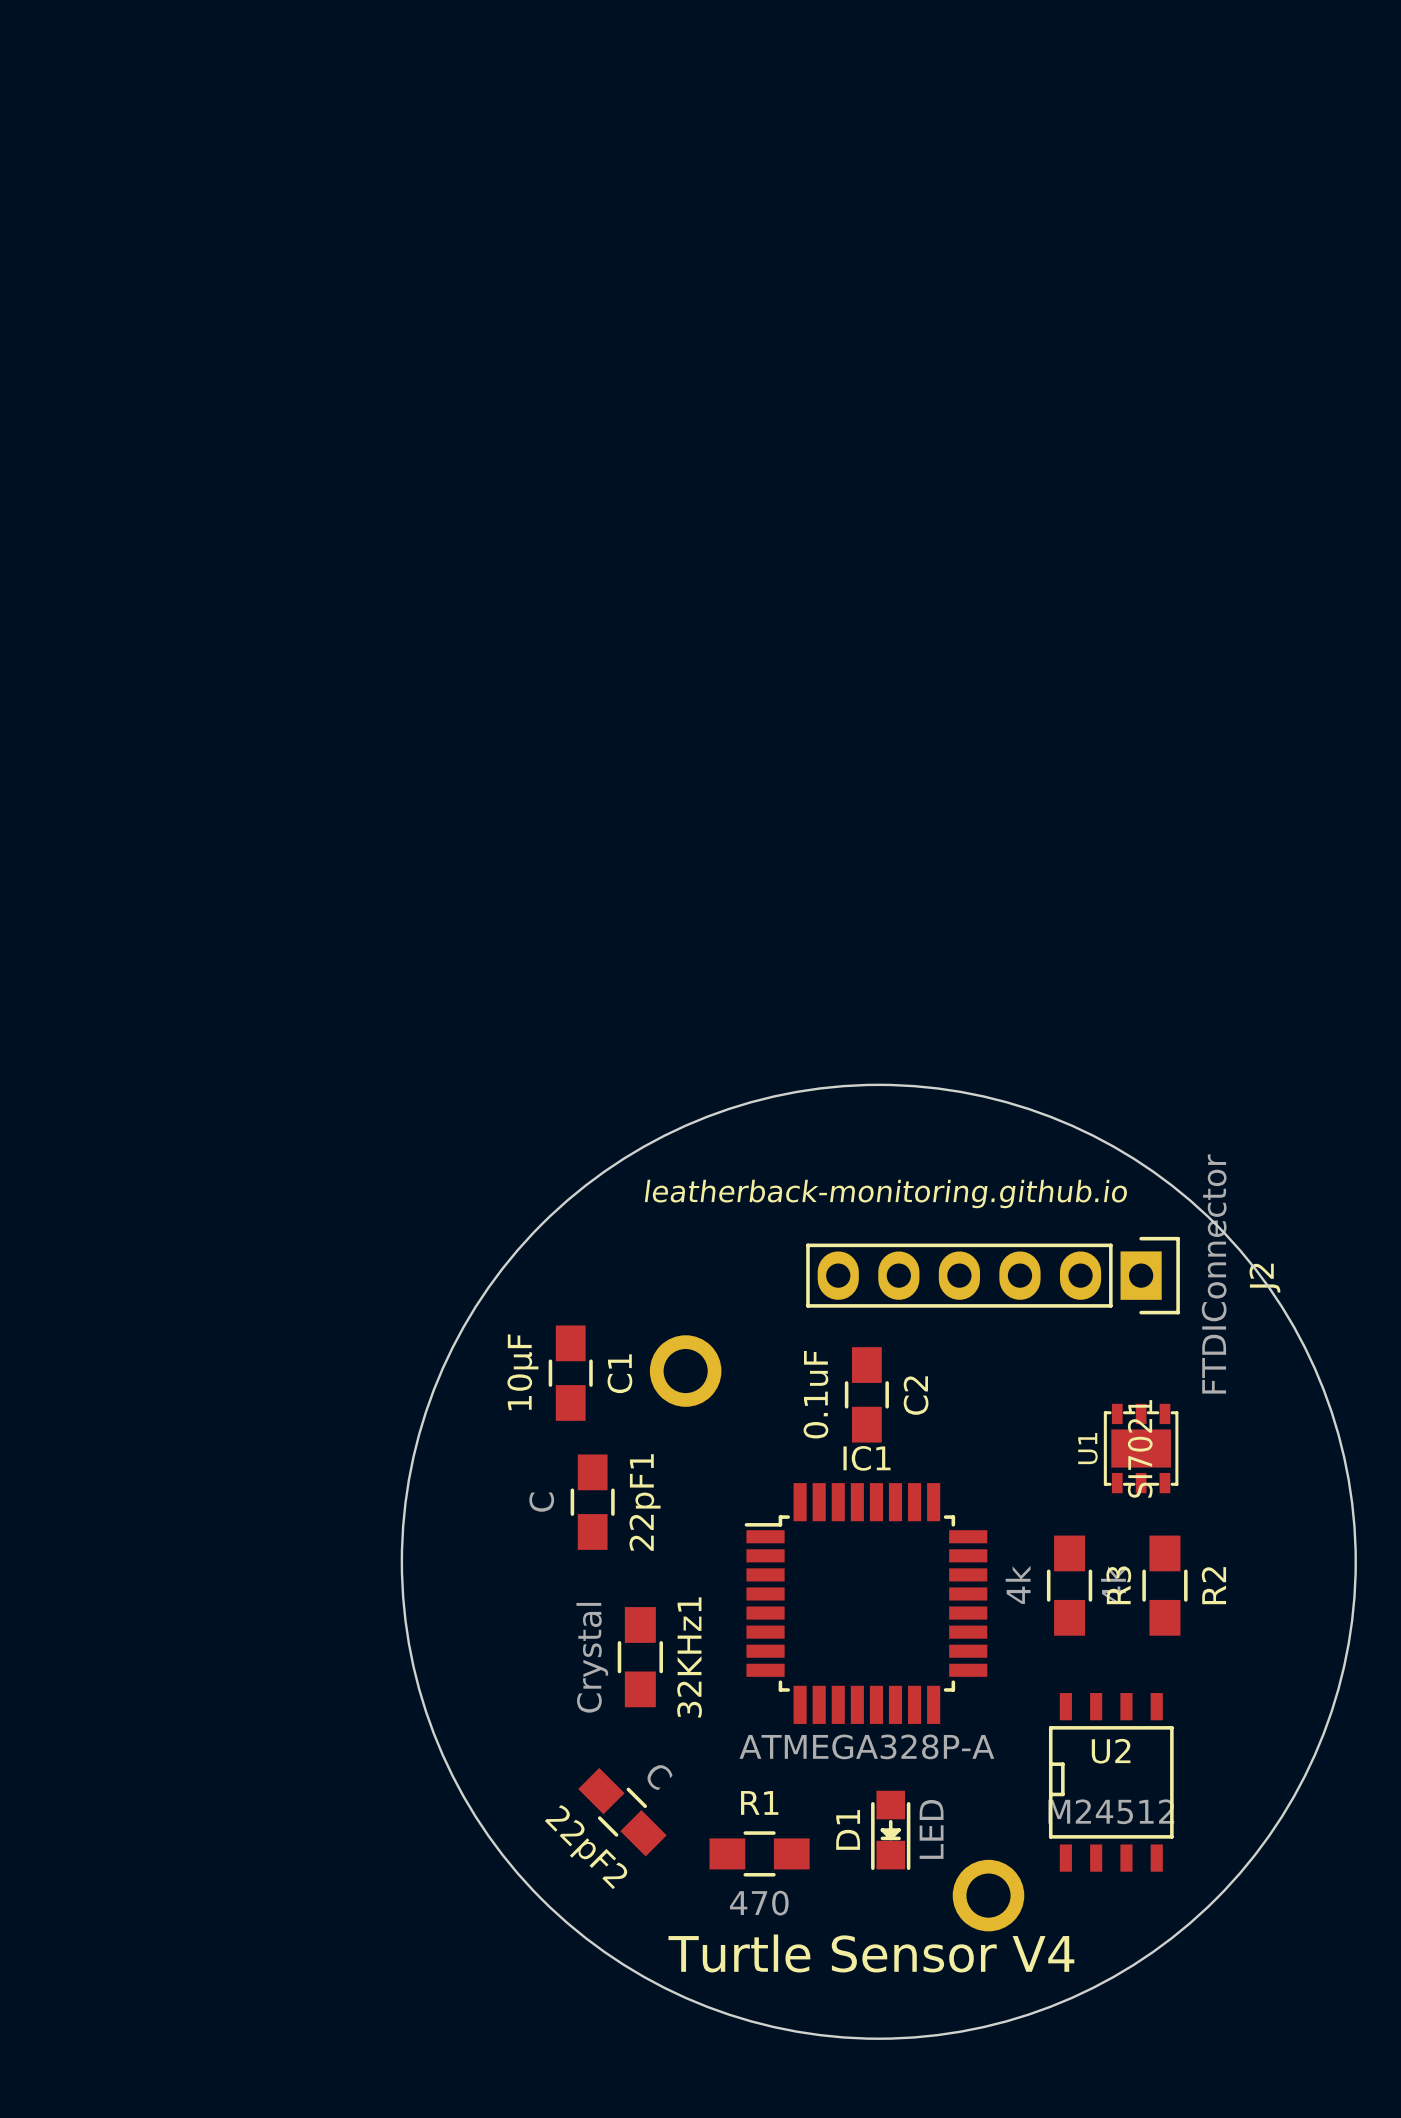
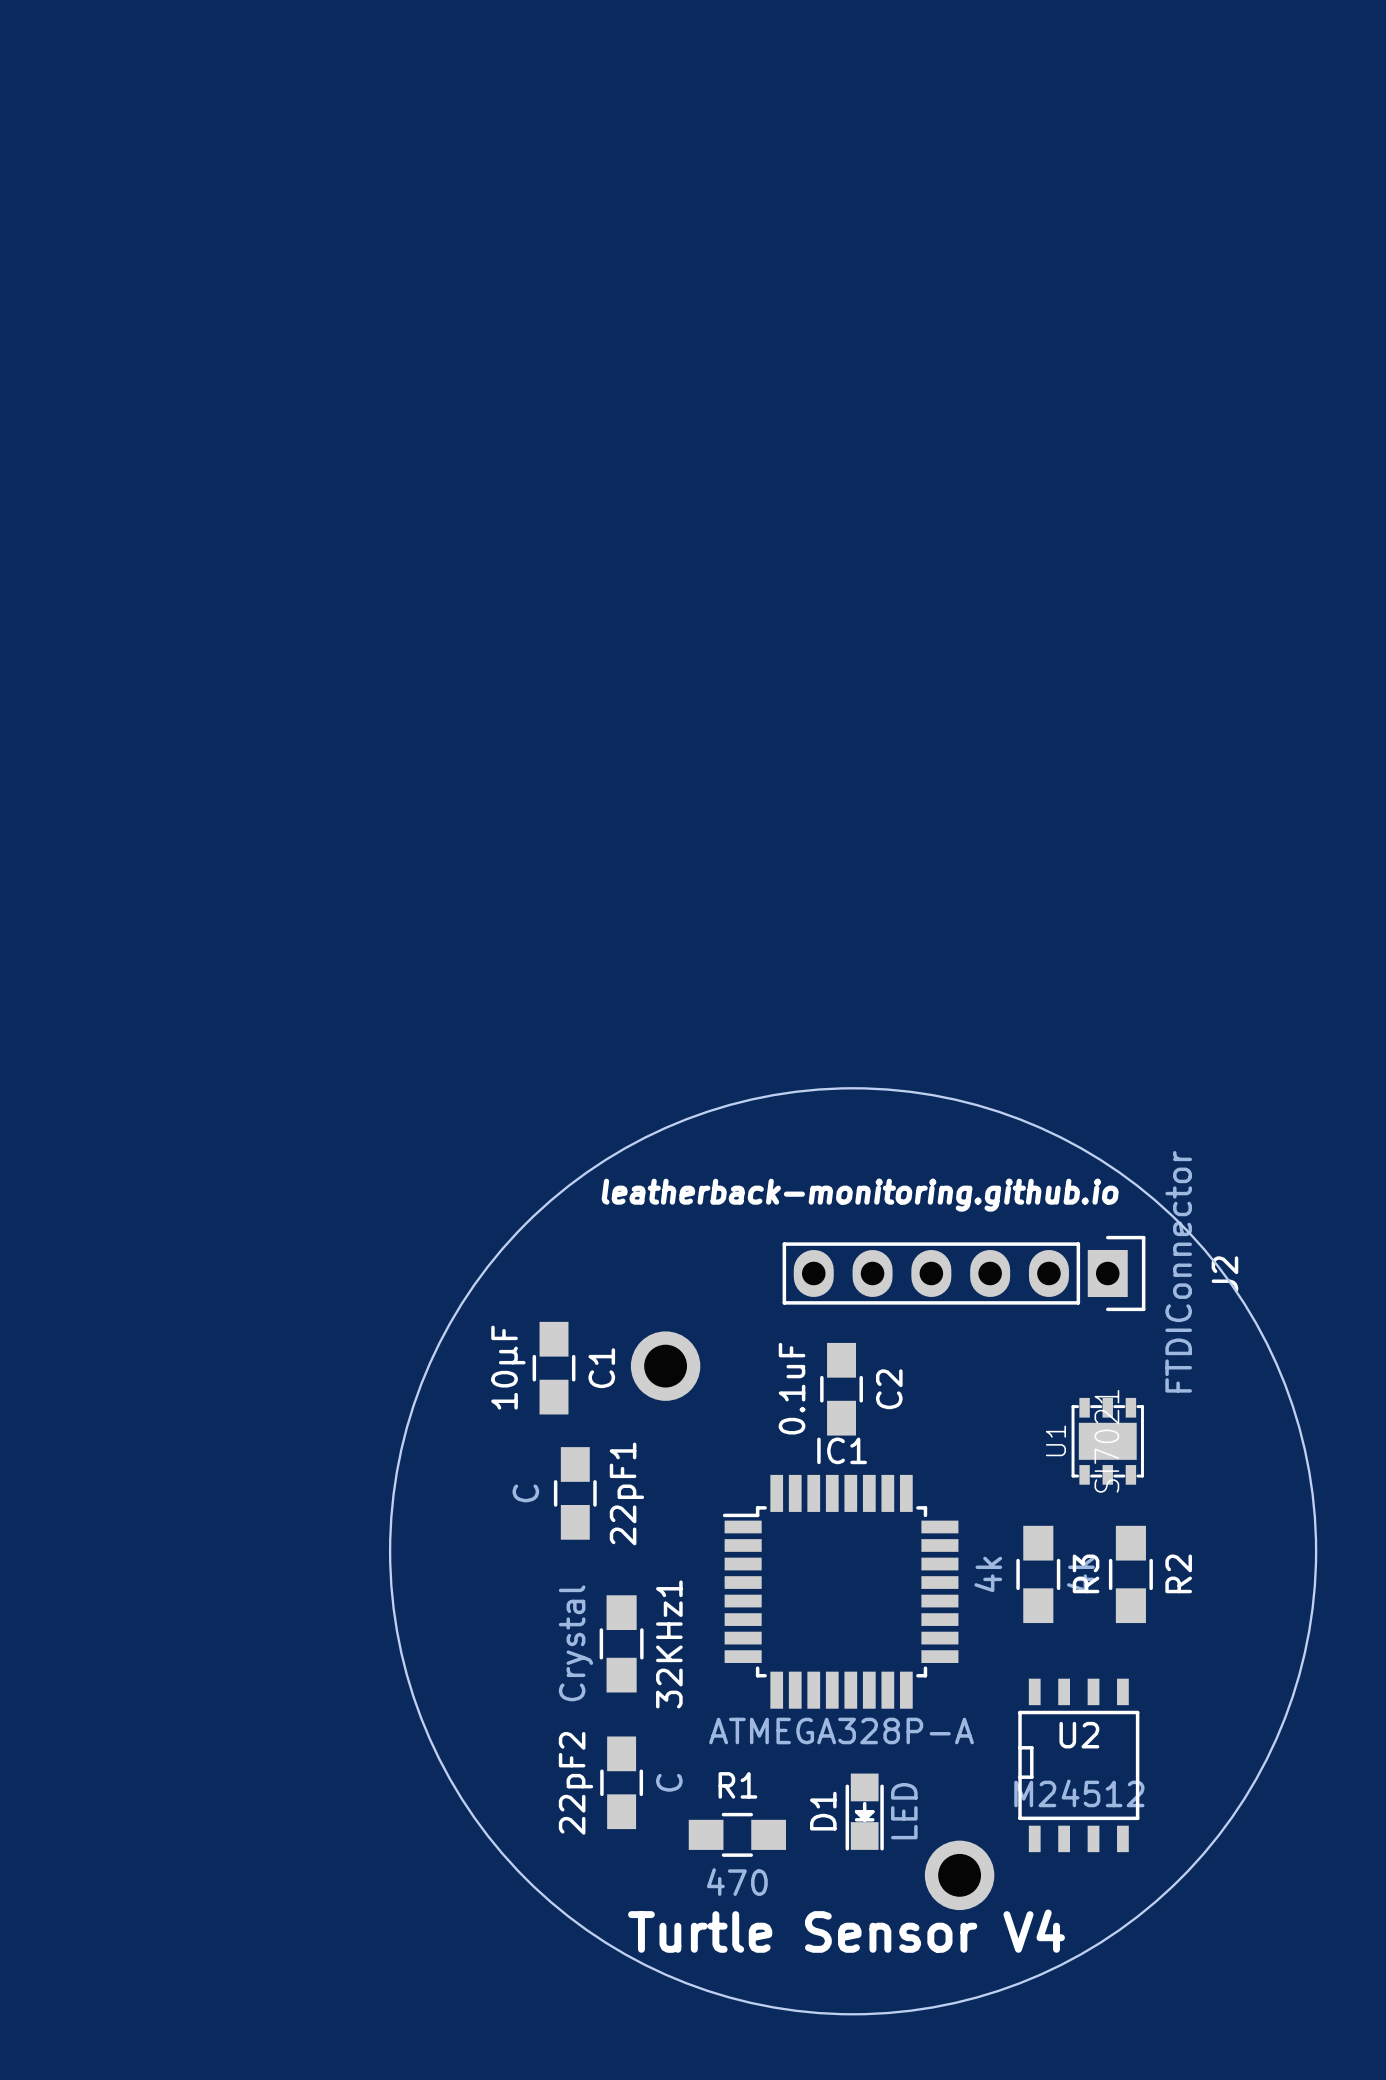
22pF2 rotation: 0° (622, 1812) -> 45° clockwise (621, 1782)

